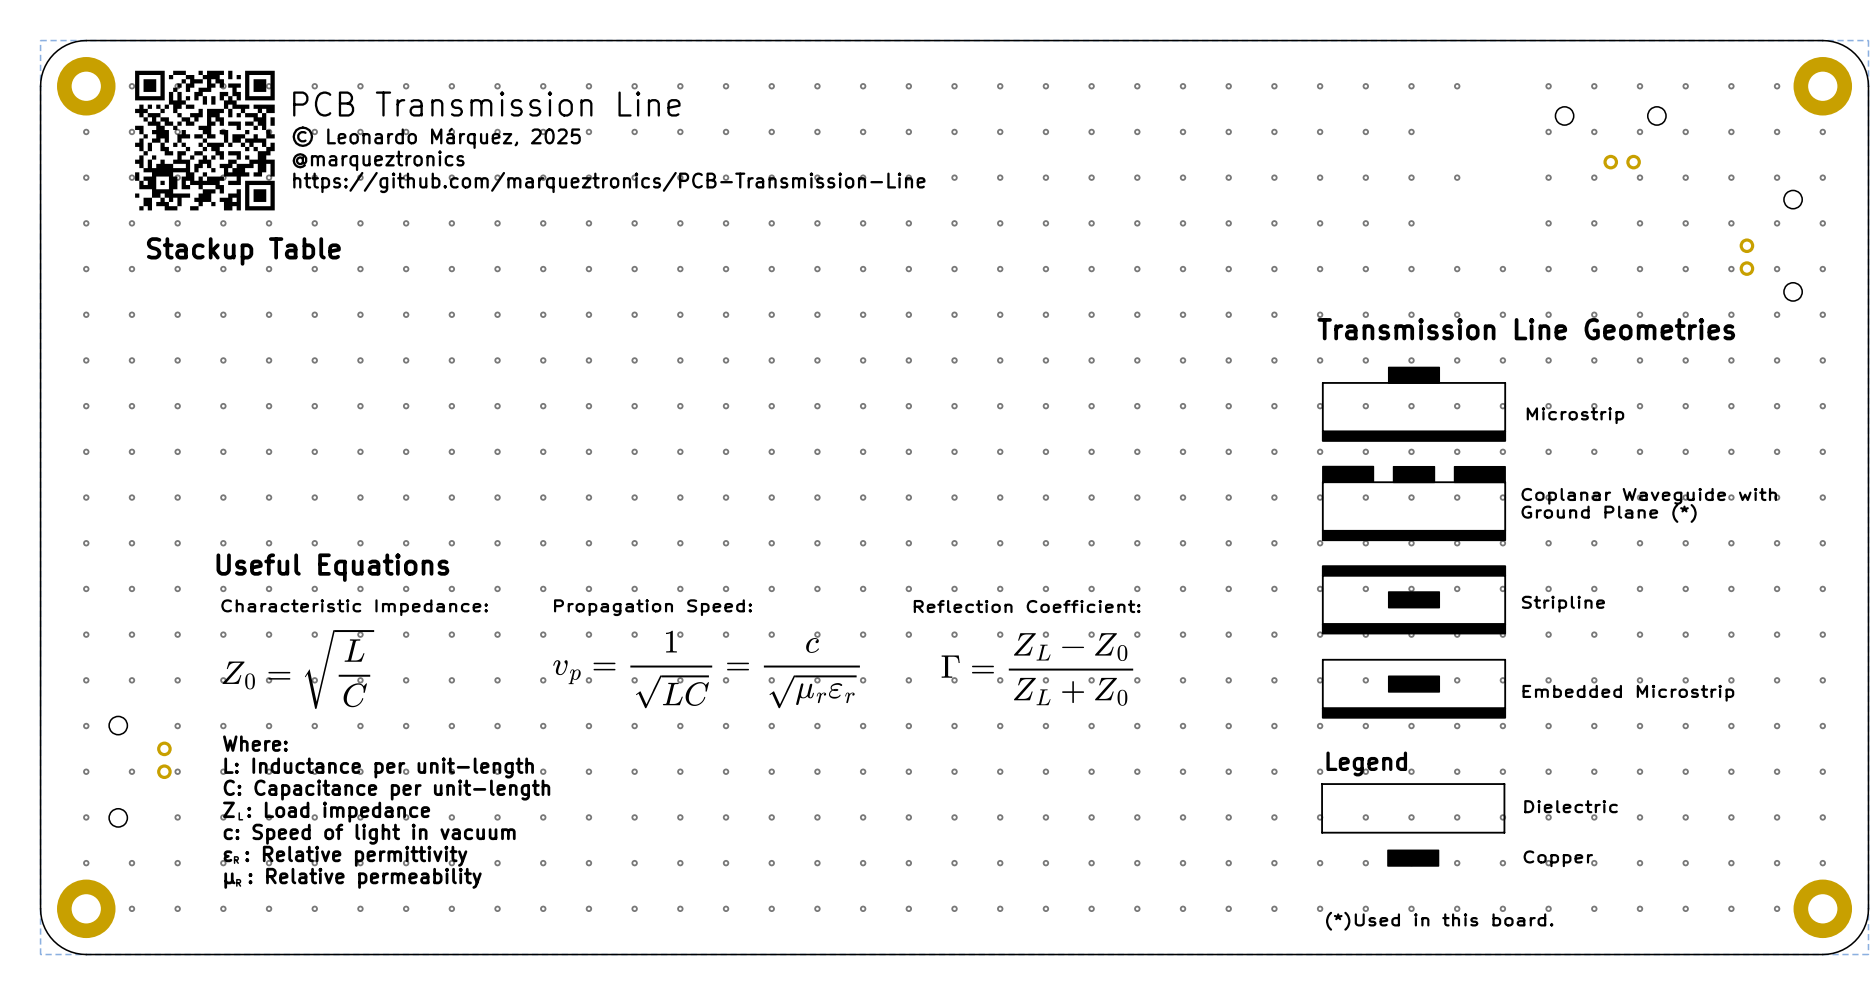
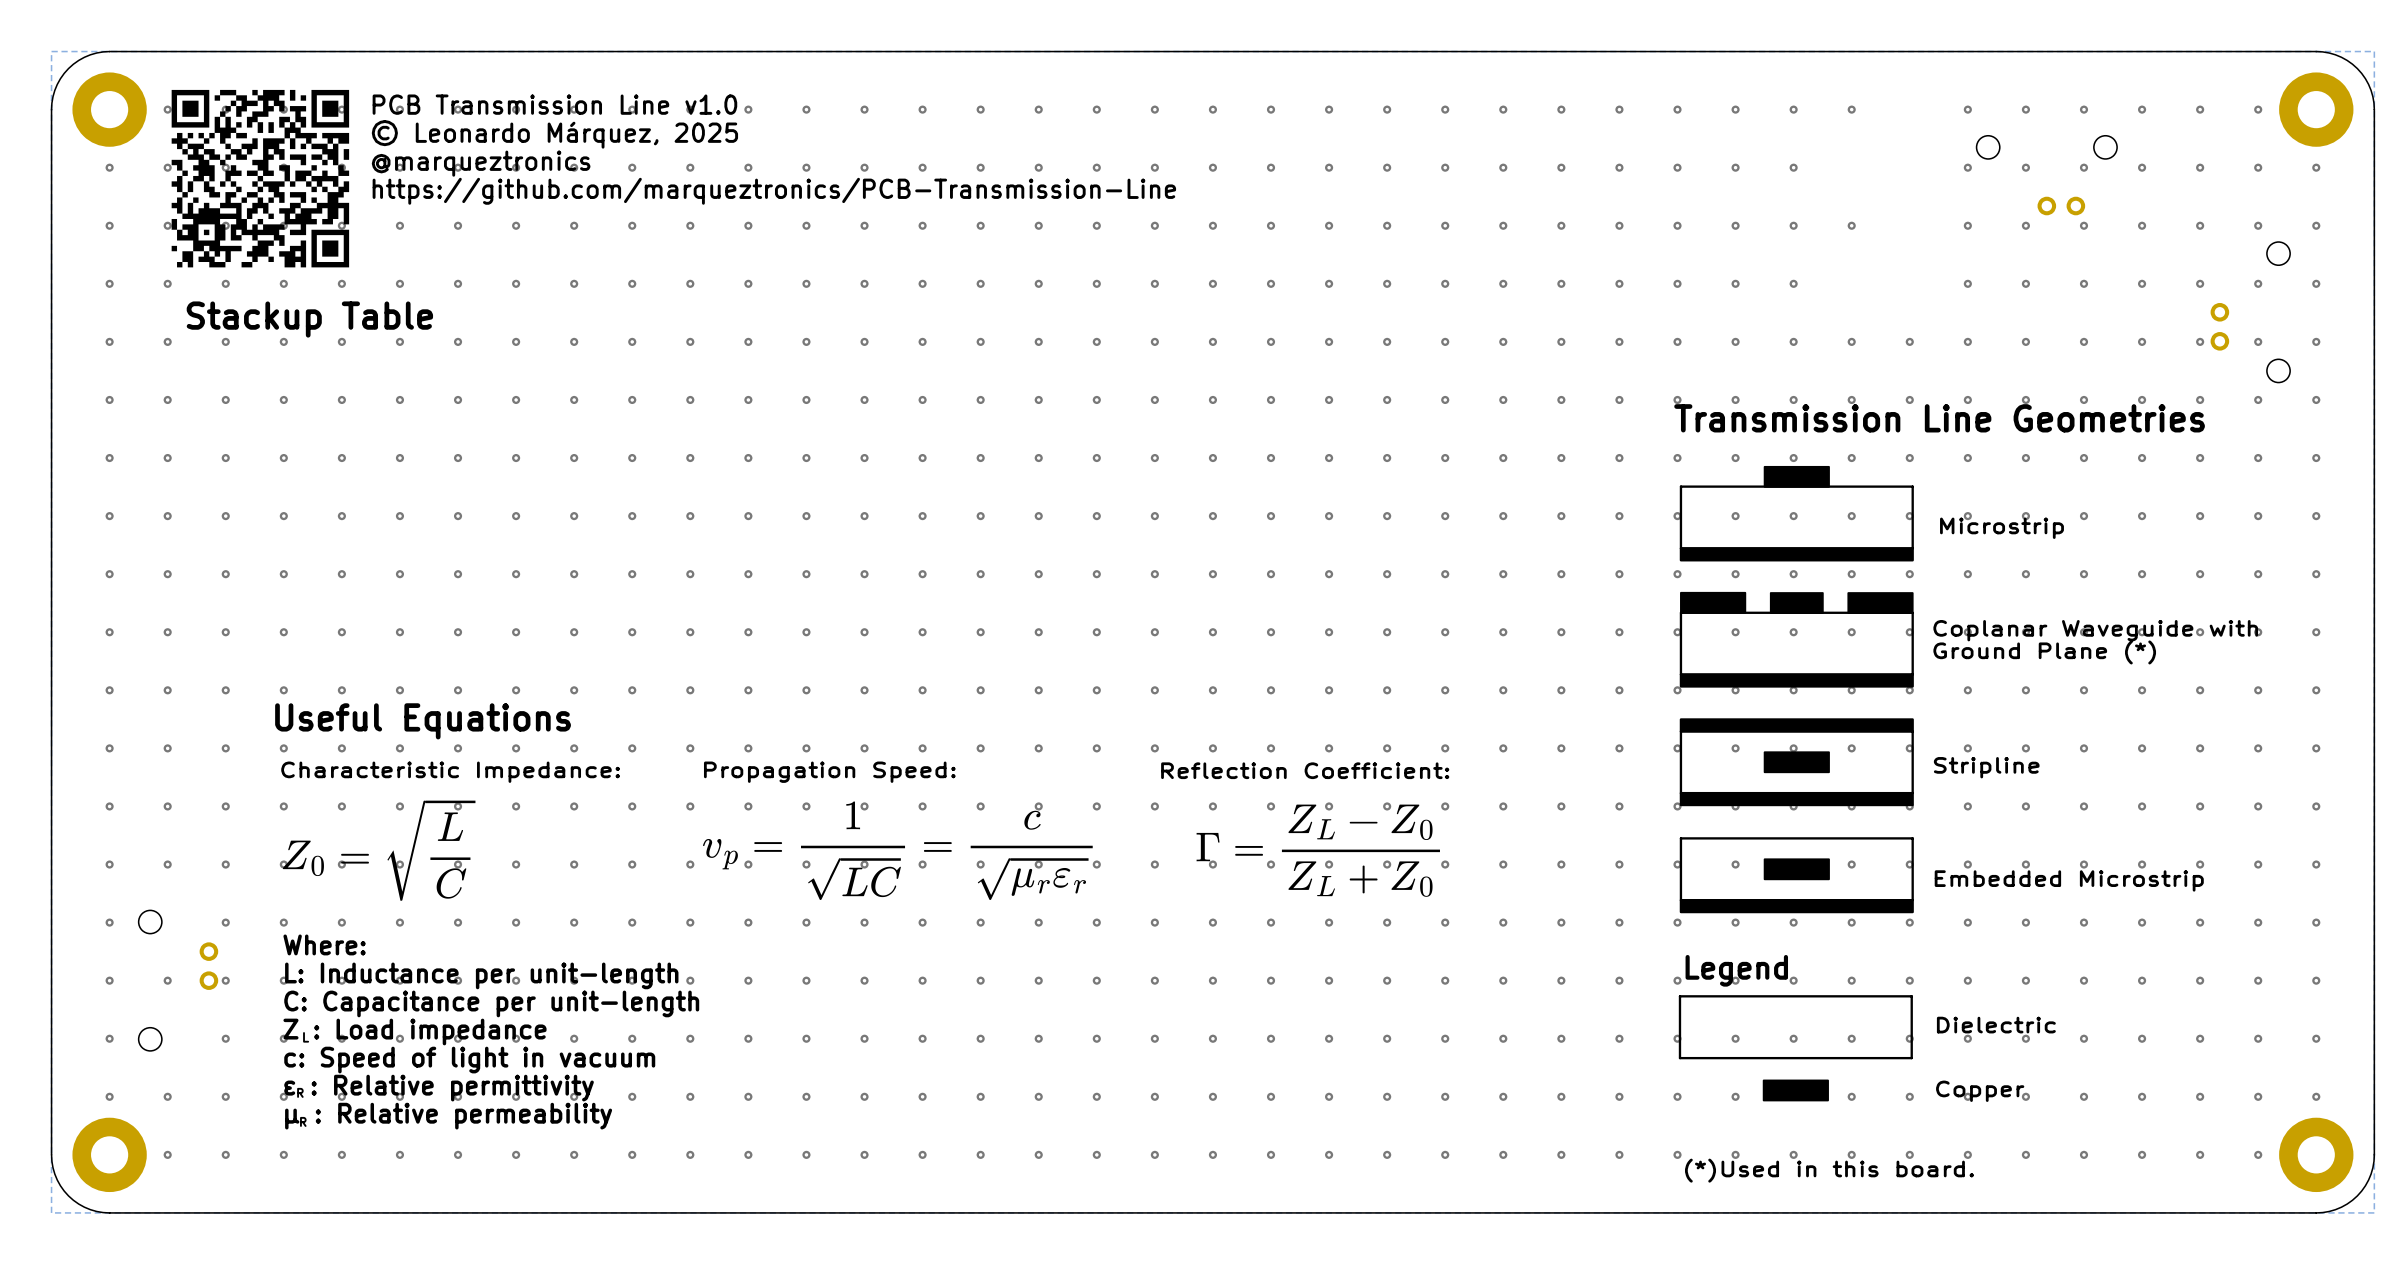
text: none -> PCB Transmission Line v1.0 (554, 104)
text: PCB Transmission Line (486, 104) -> © Leonardo Márquez, 2025 (554, 134)
text: © Leonardo Márquez, 2025 (436, 137) -> none
text position: @marqueztronics (378, 160) -> @marqueztronics (481, 163)
text position: https://github.com/marqueztronics/PCB-Transmission-Line (609, 182) -> https://github.com/marqueztronics/PCB-Transmission-Line (774, 191)

